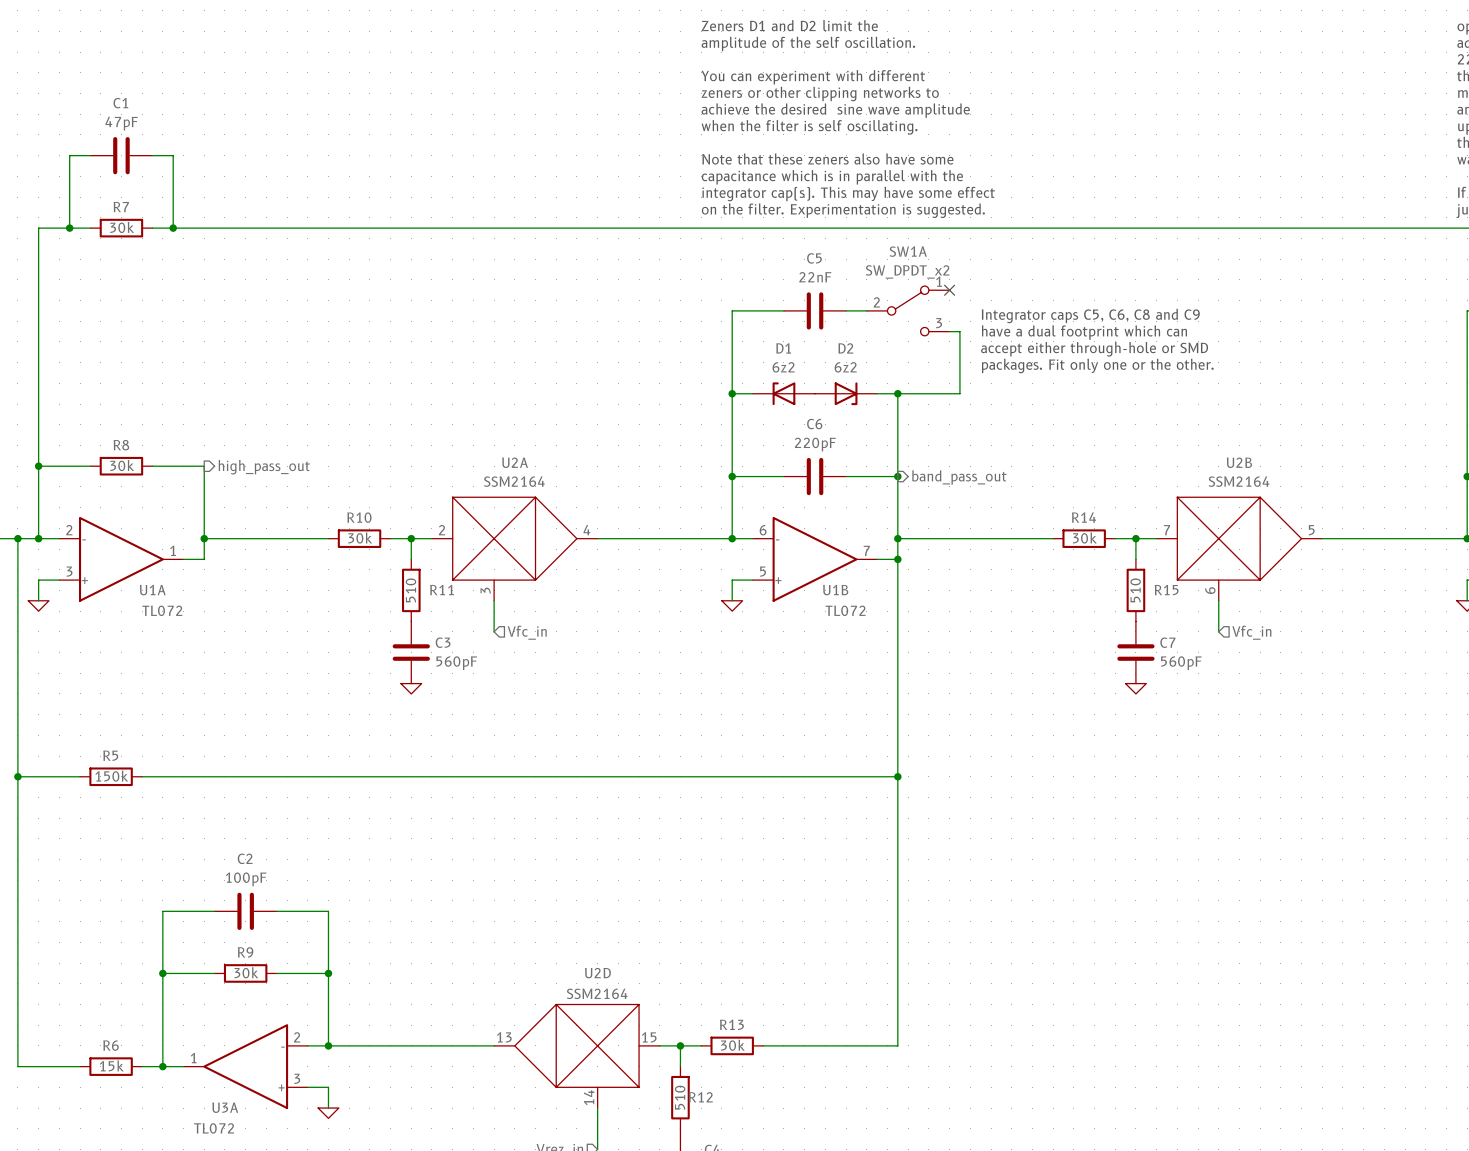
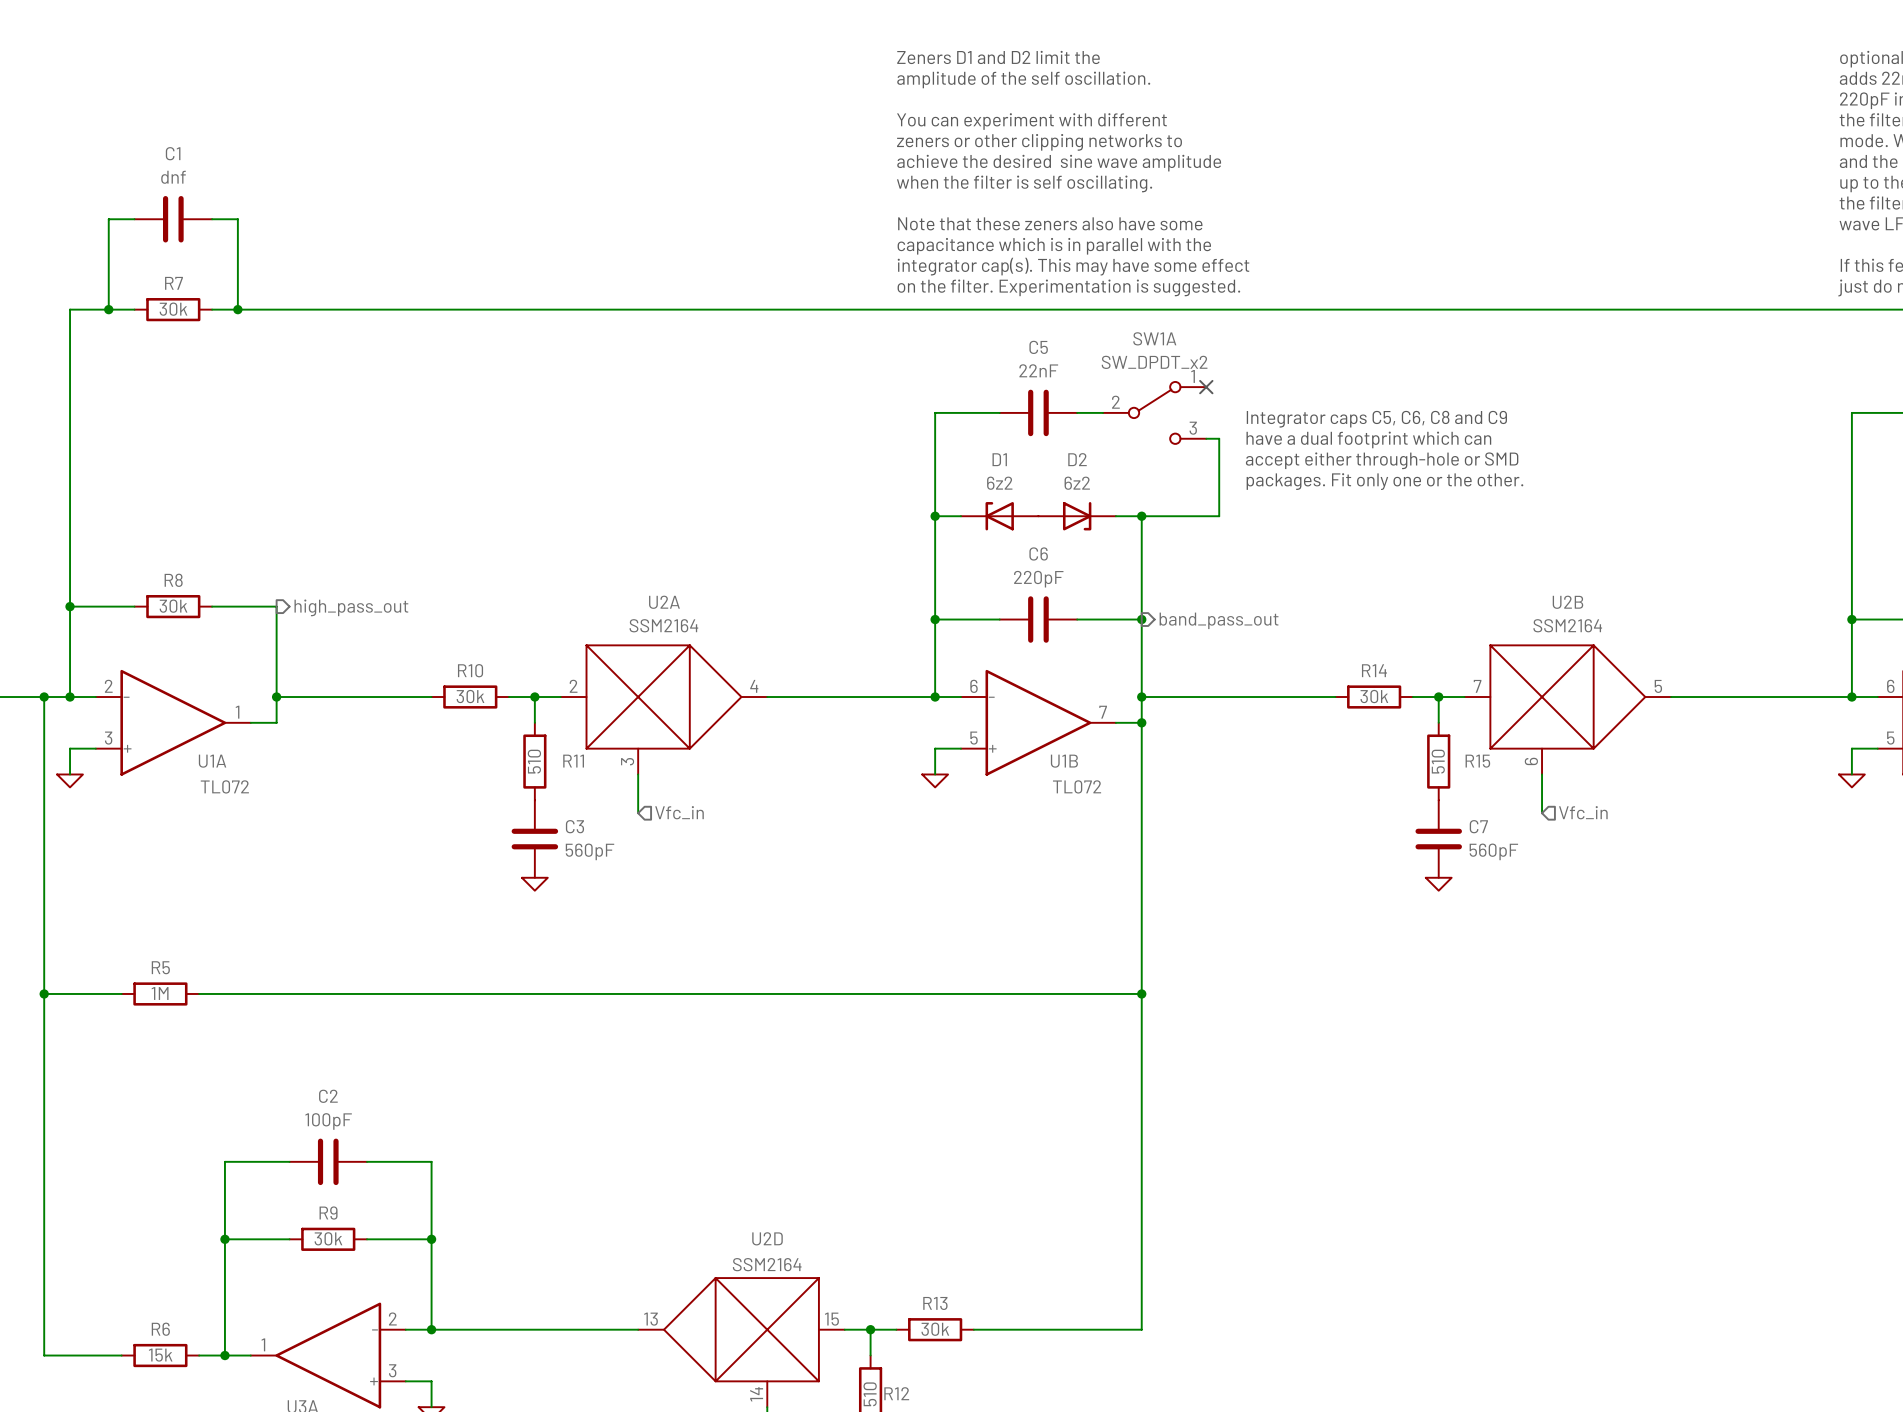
C1 value: 47pF (121, 123) -> dnf (173, 177)
R5 value: 150k (111, 776) -> 1M (160, 993)

